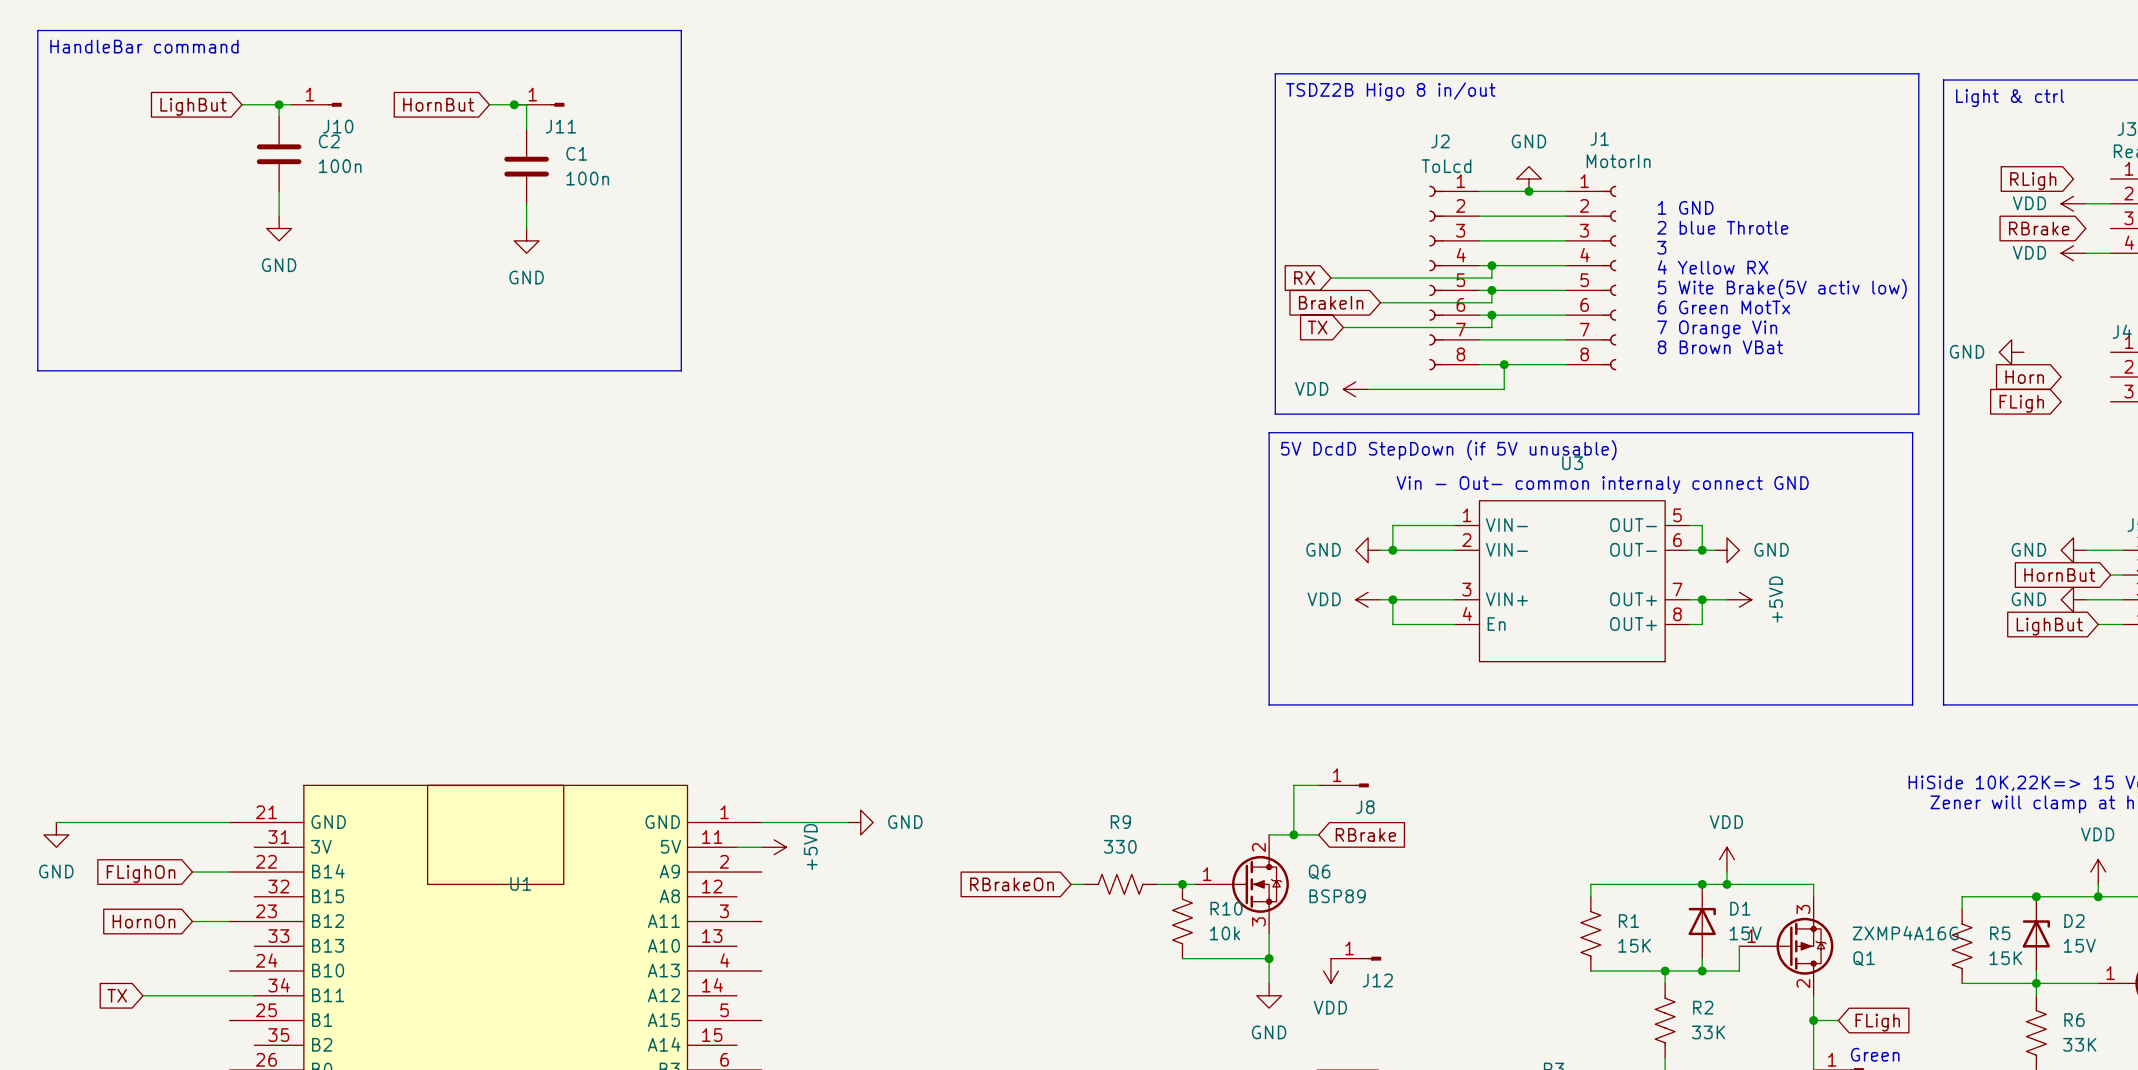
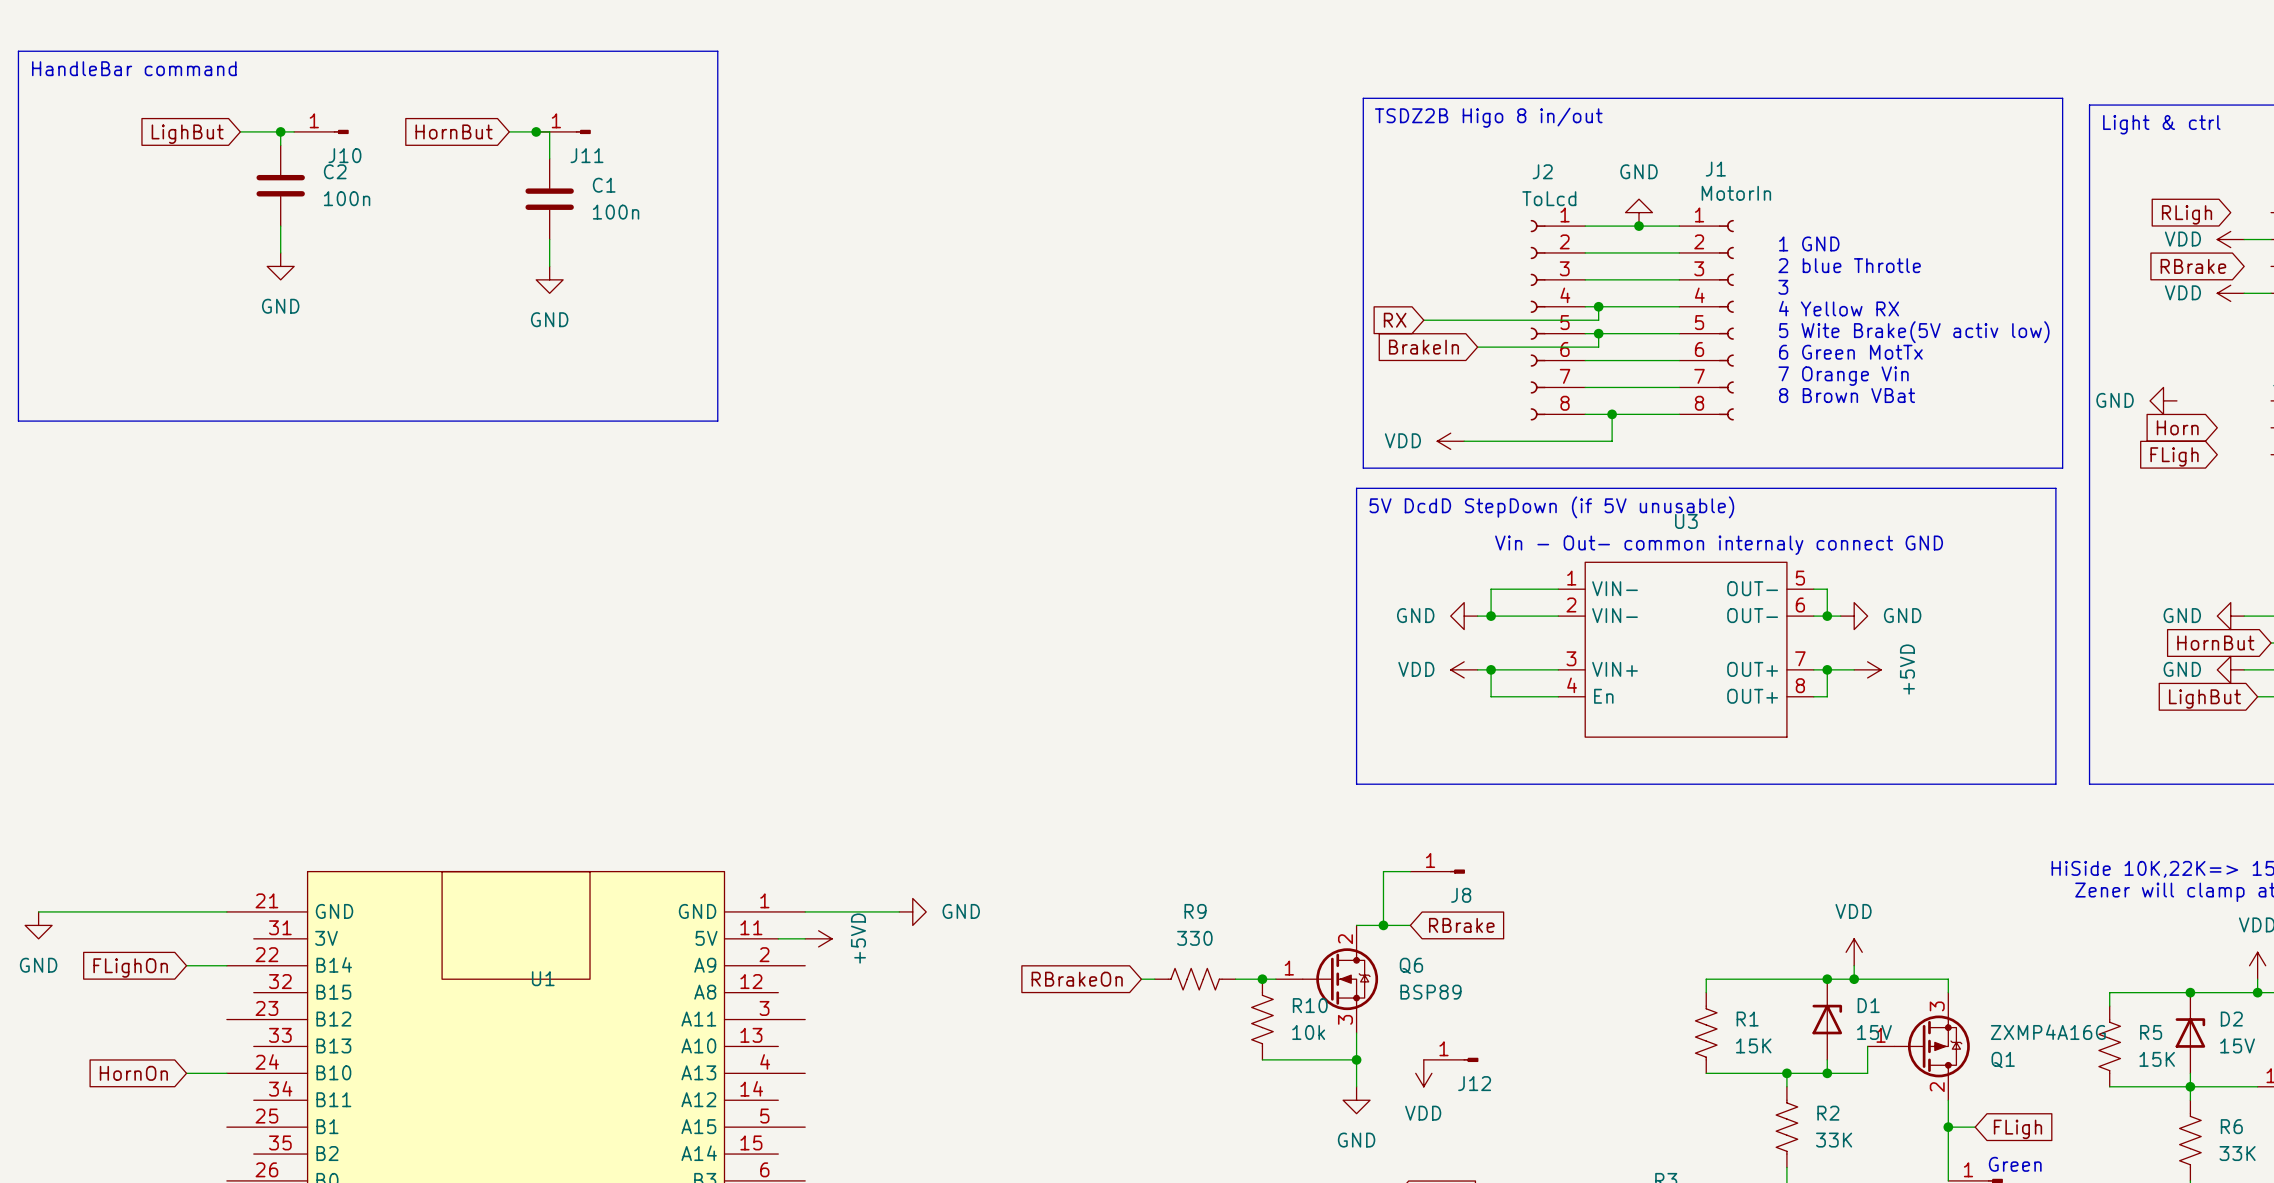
wire: (1491, 315) (1491, 327) (1343, 327) -> none
junction: (1491, 315) -> none
global label: TX (1317, 327) -> none
global label position: HornOn (144, 921) -> HornOn (133, 1073)
wire: (192, 921) (229, 921) -> (186, 1073) (226, 1073)
global label: TX (117, 995) -> none
wire: (142, 995) (254, 995) -> none

